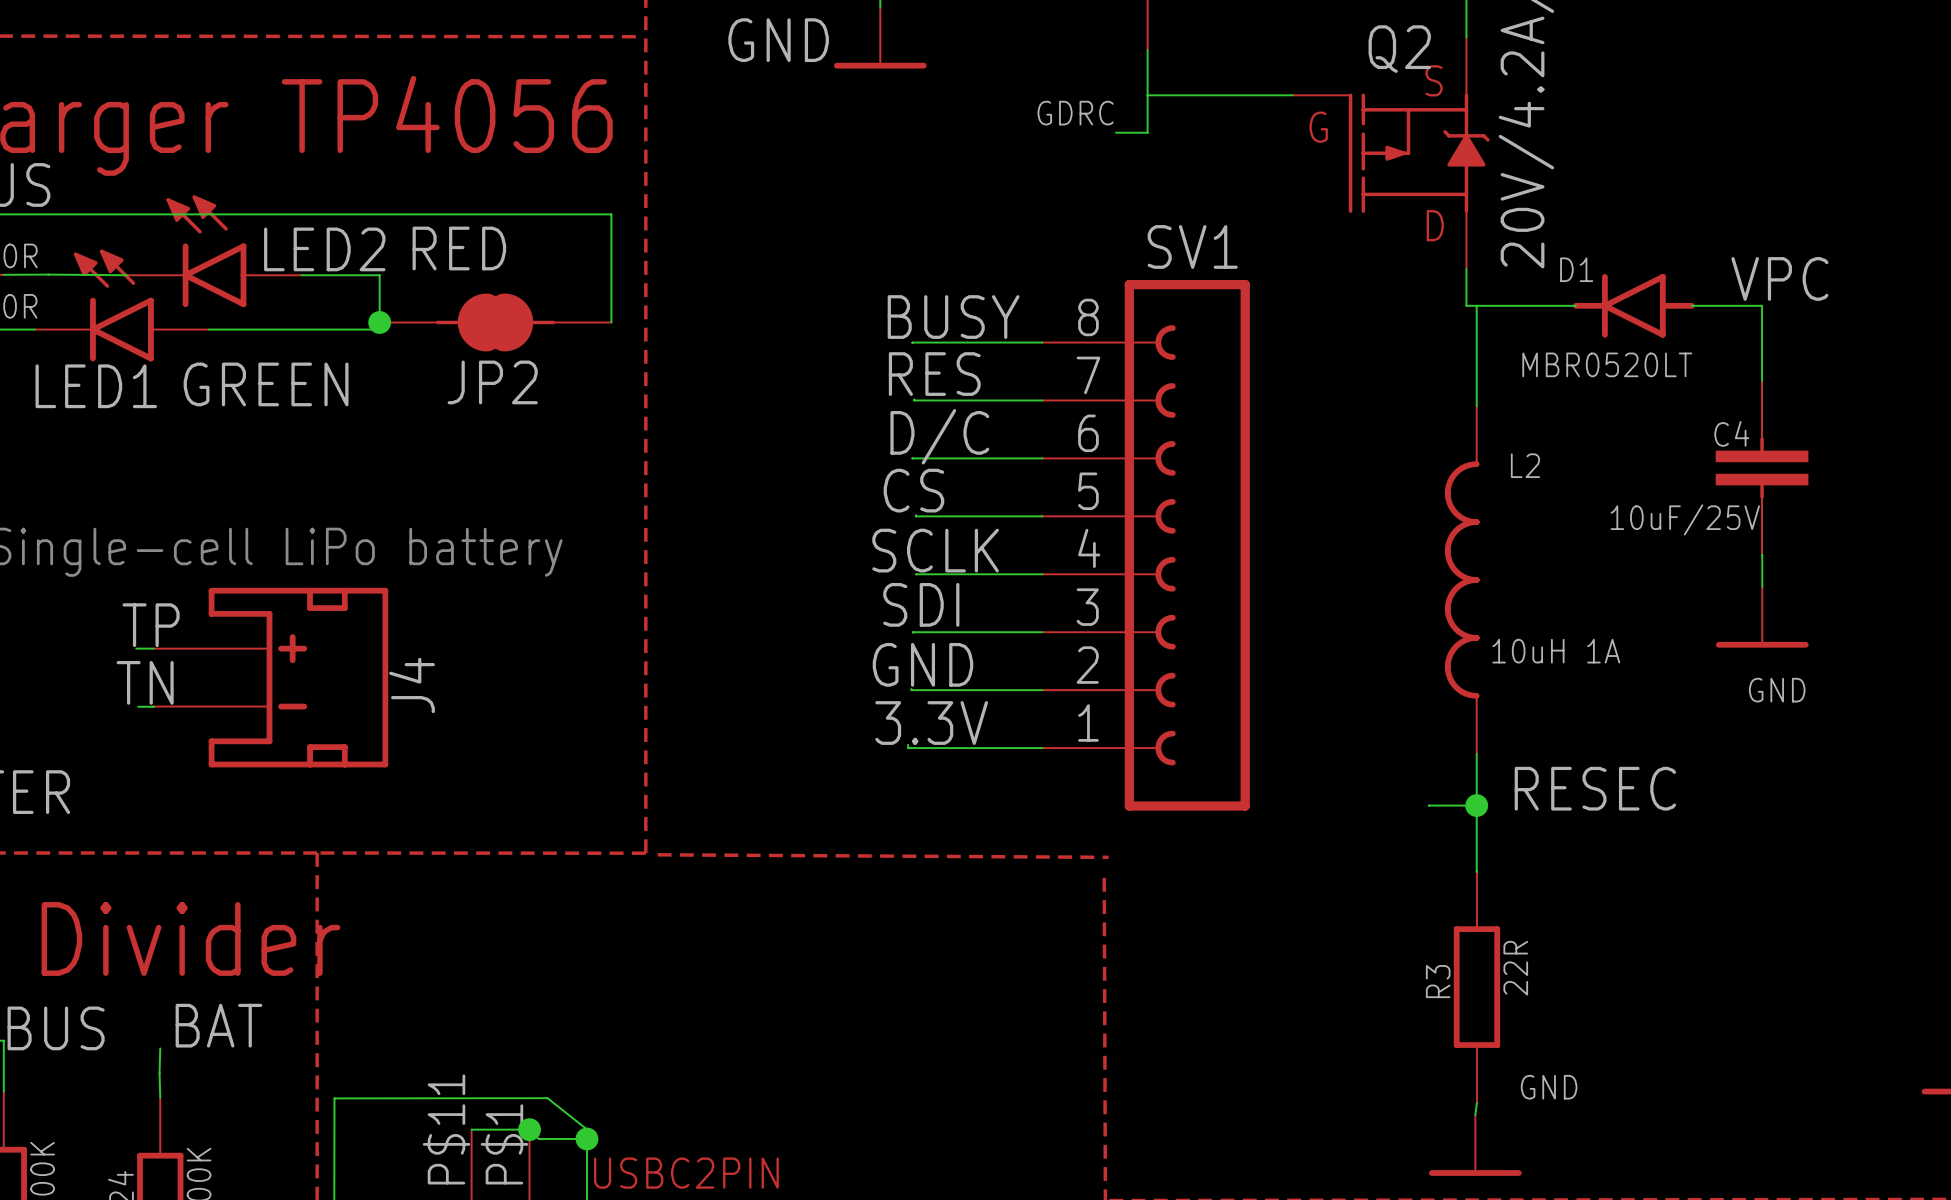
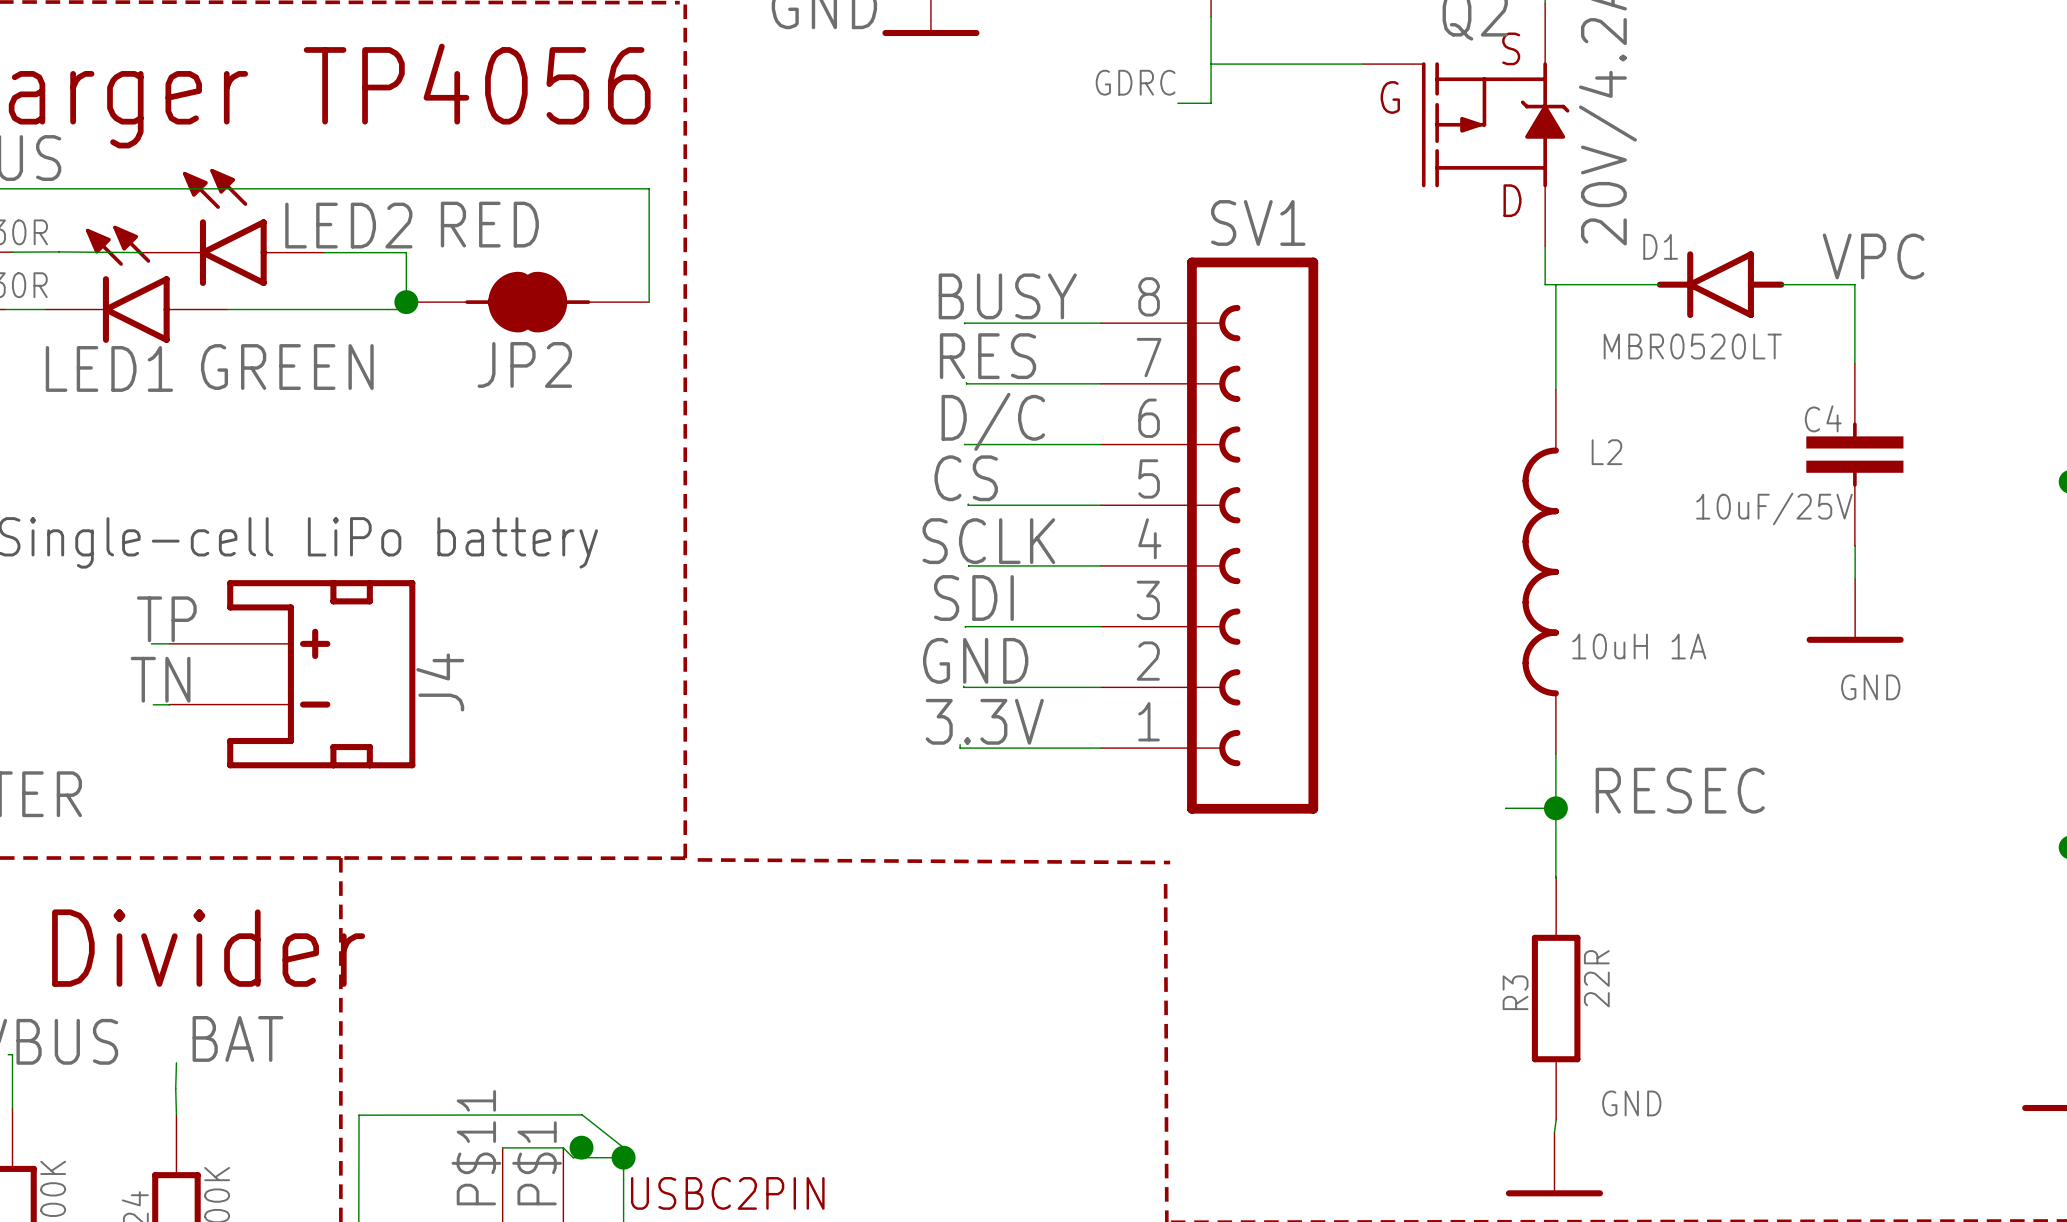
junction position: (529, 1129) -> (581, 1147)

